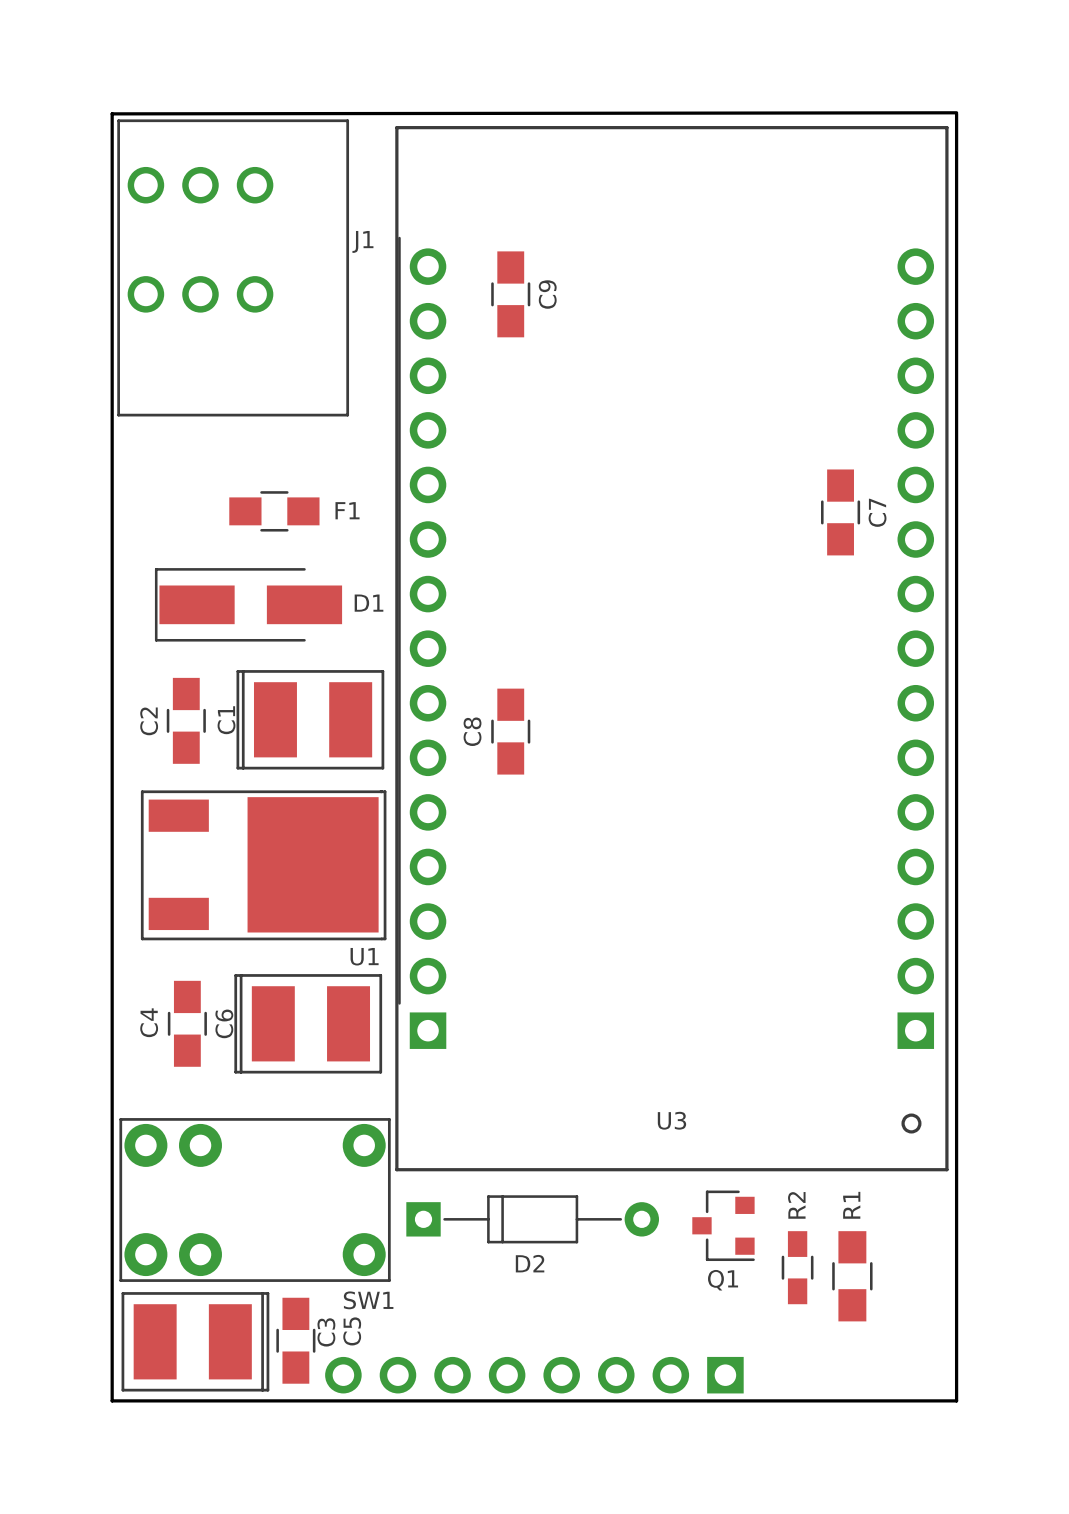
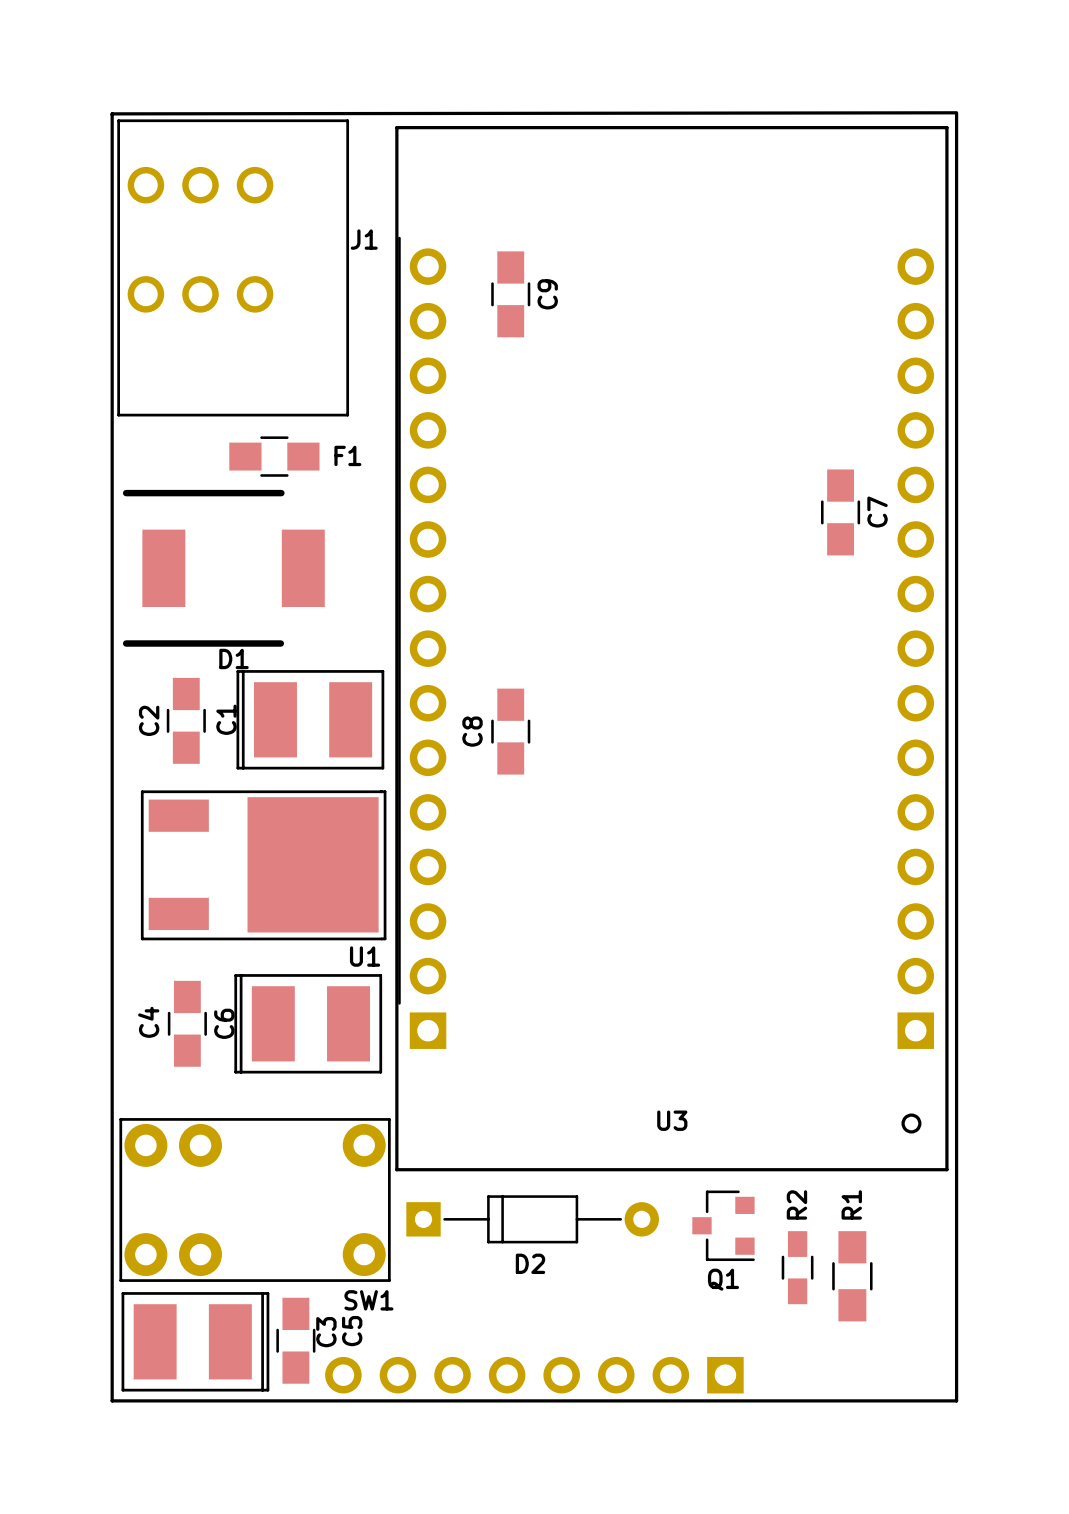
F1 position: (274, 511) -> (274, 456)
D1 footprint: [154, 568, 343, 642] -> [122, 489, 325, 647]
D1 name position: D1 (369, 603) -> D1 (233, 658)

